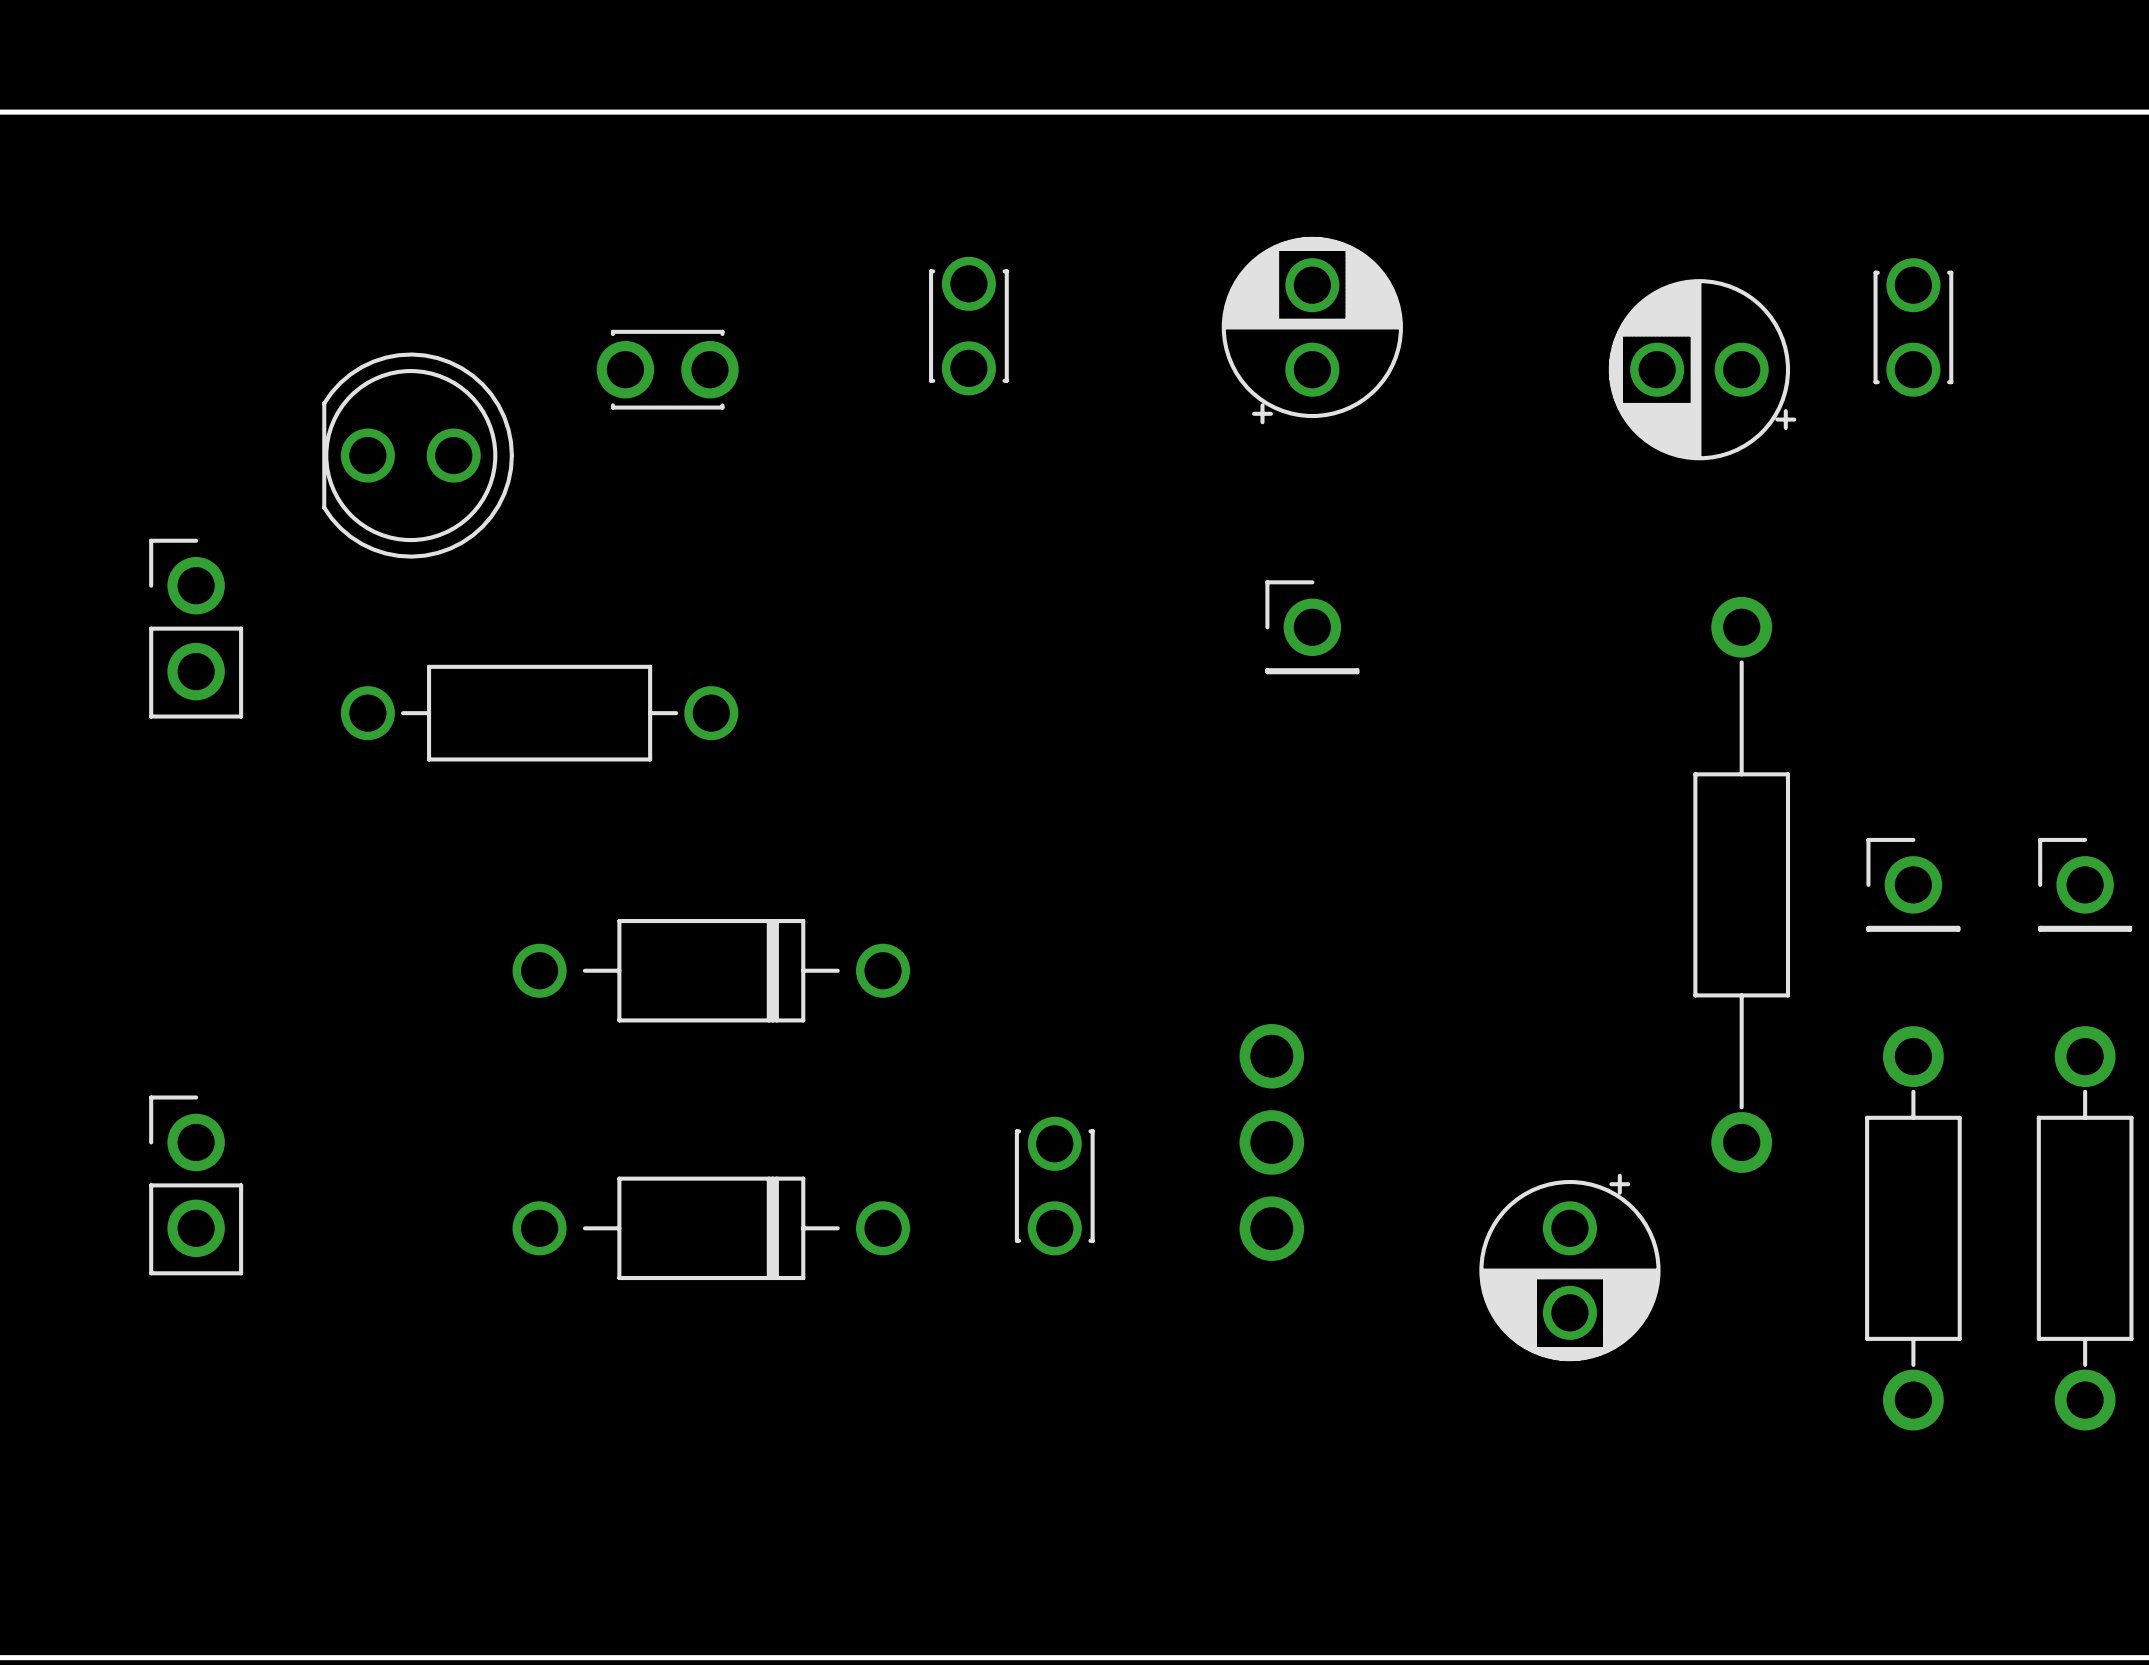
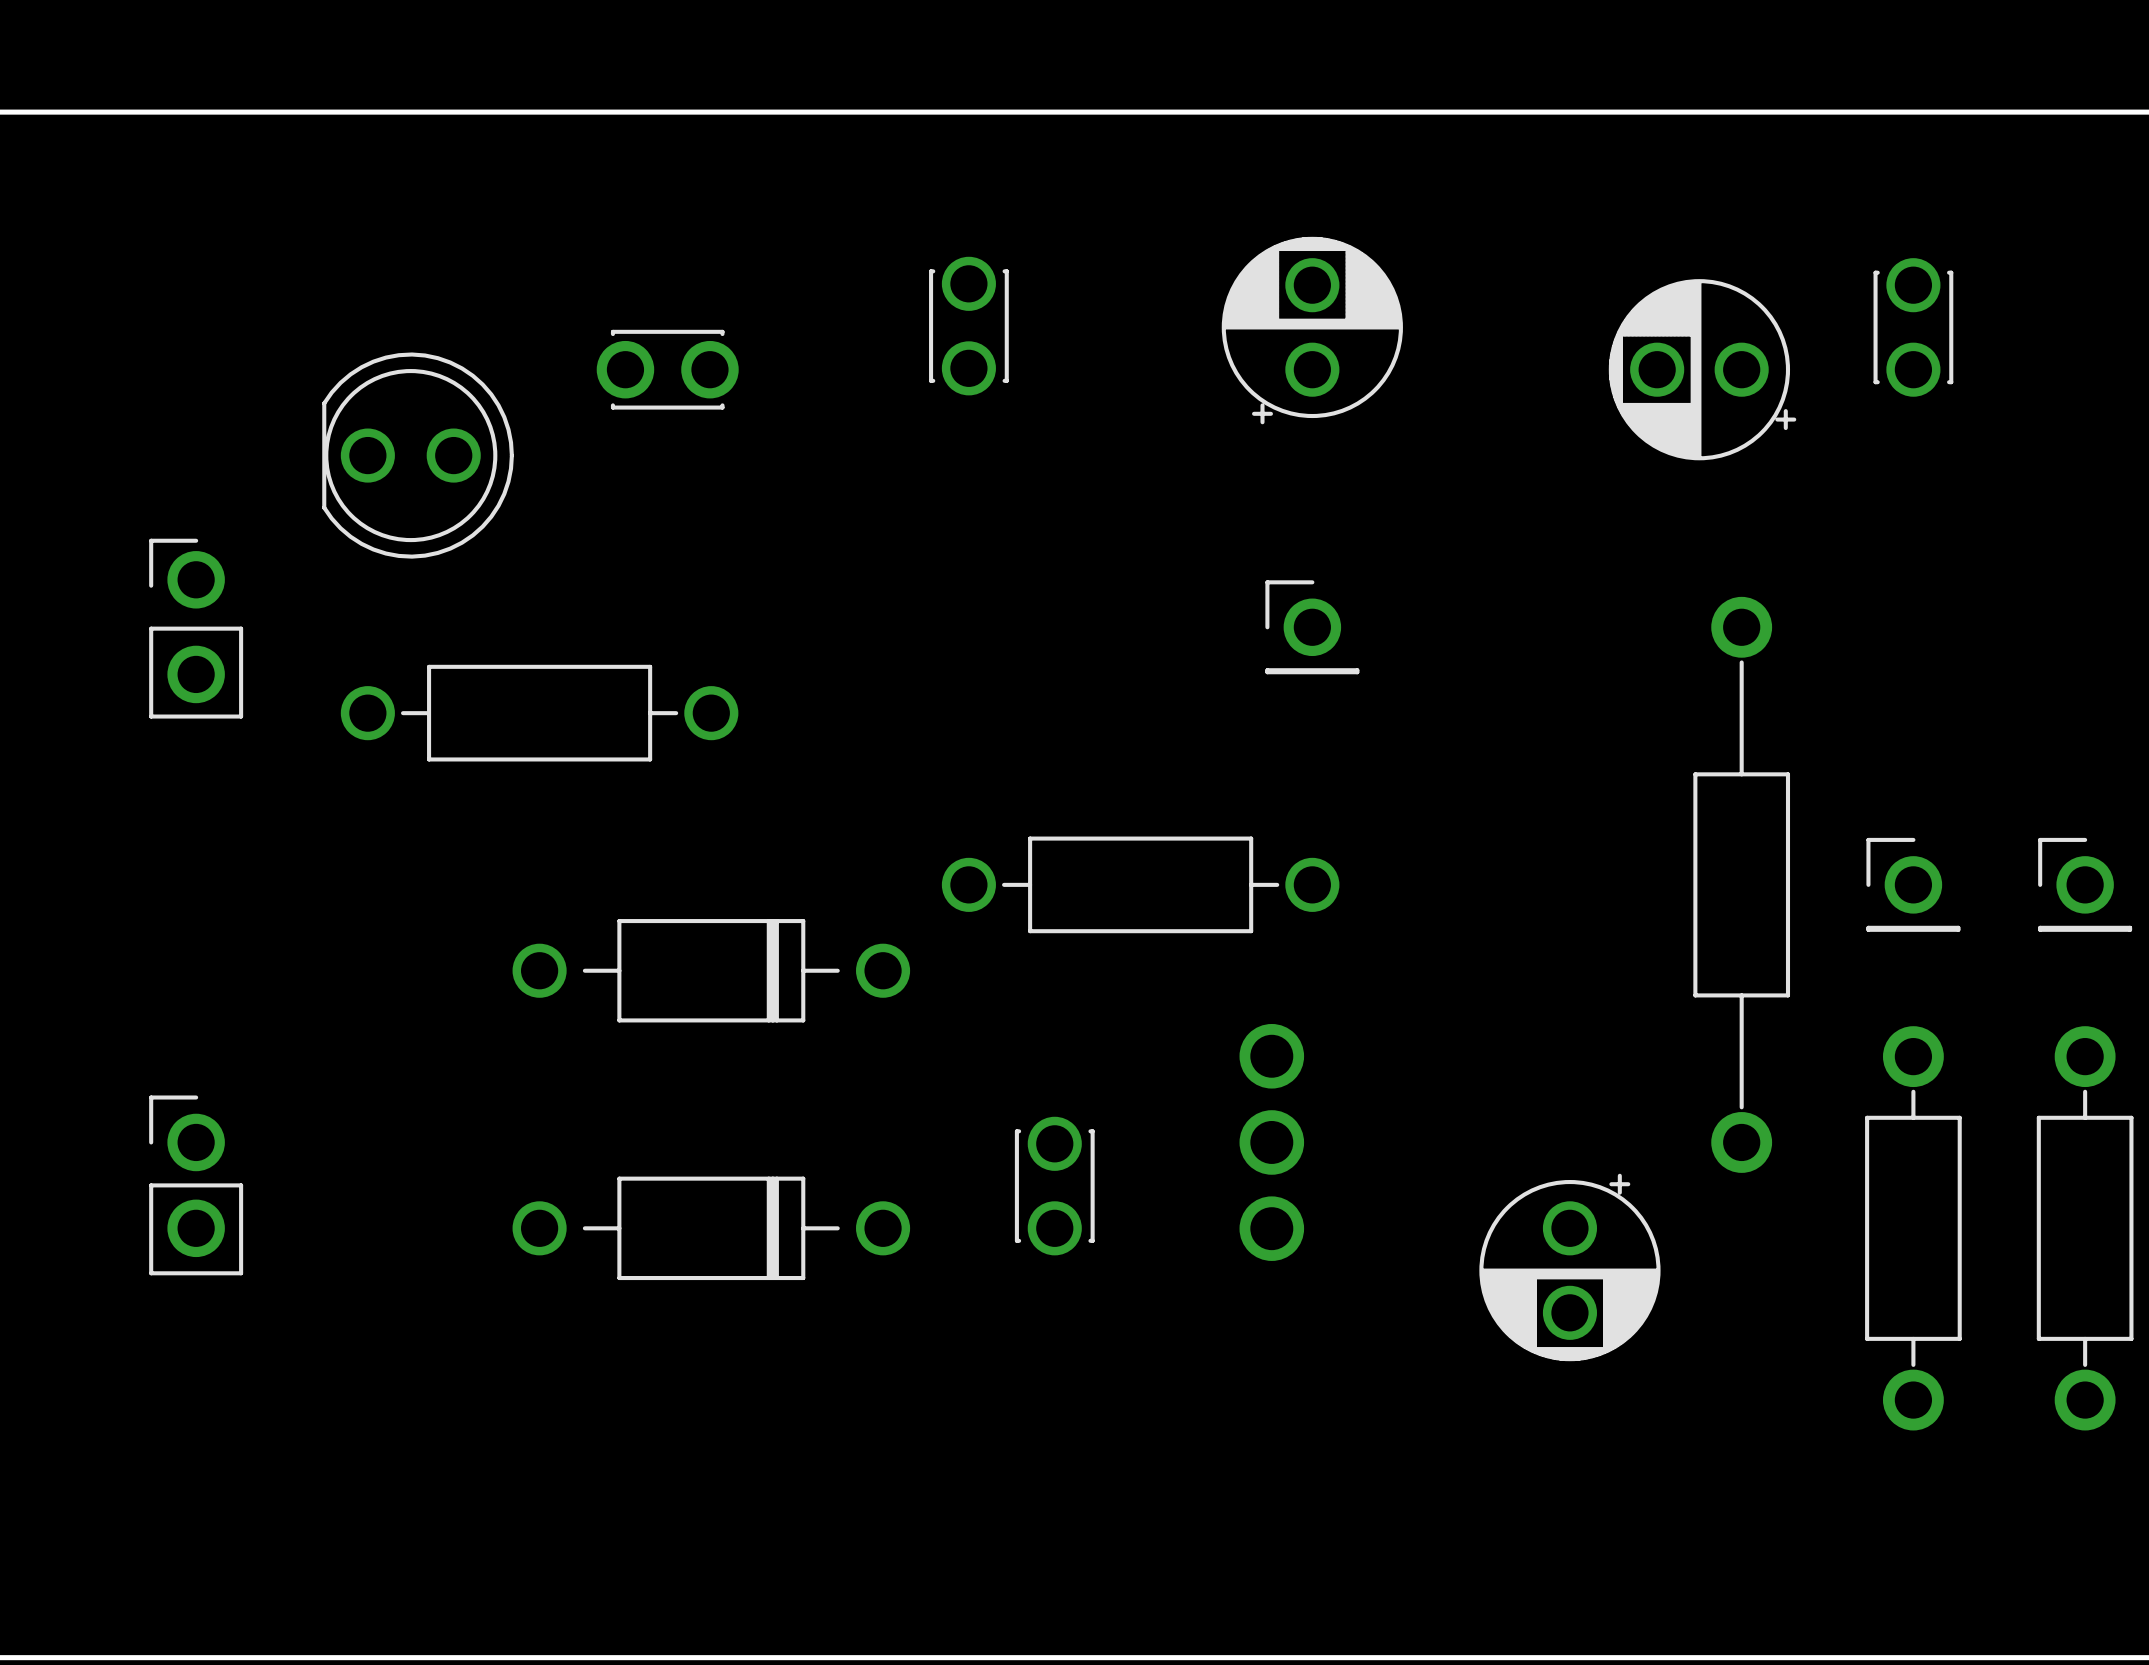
part footprint: [149, 538, 244, 719] -> [149, 538, 244, 719]
part: none -> (1140, 884)

